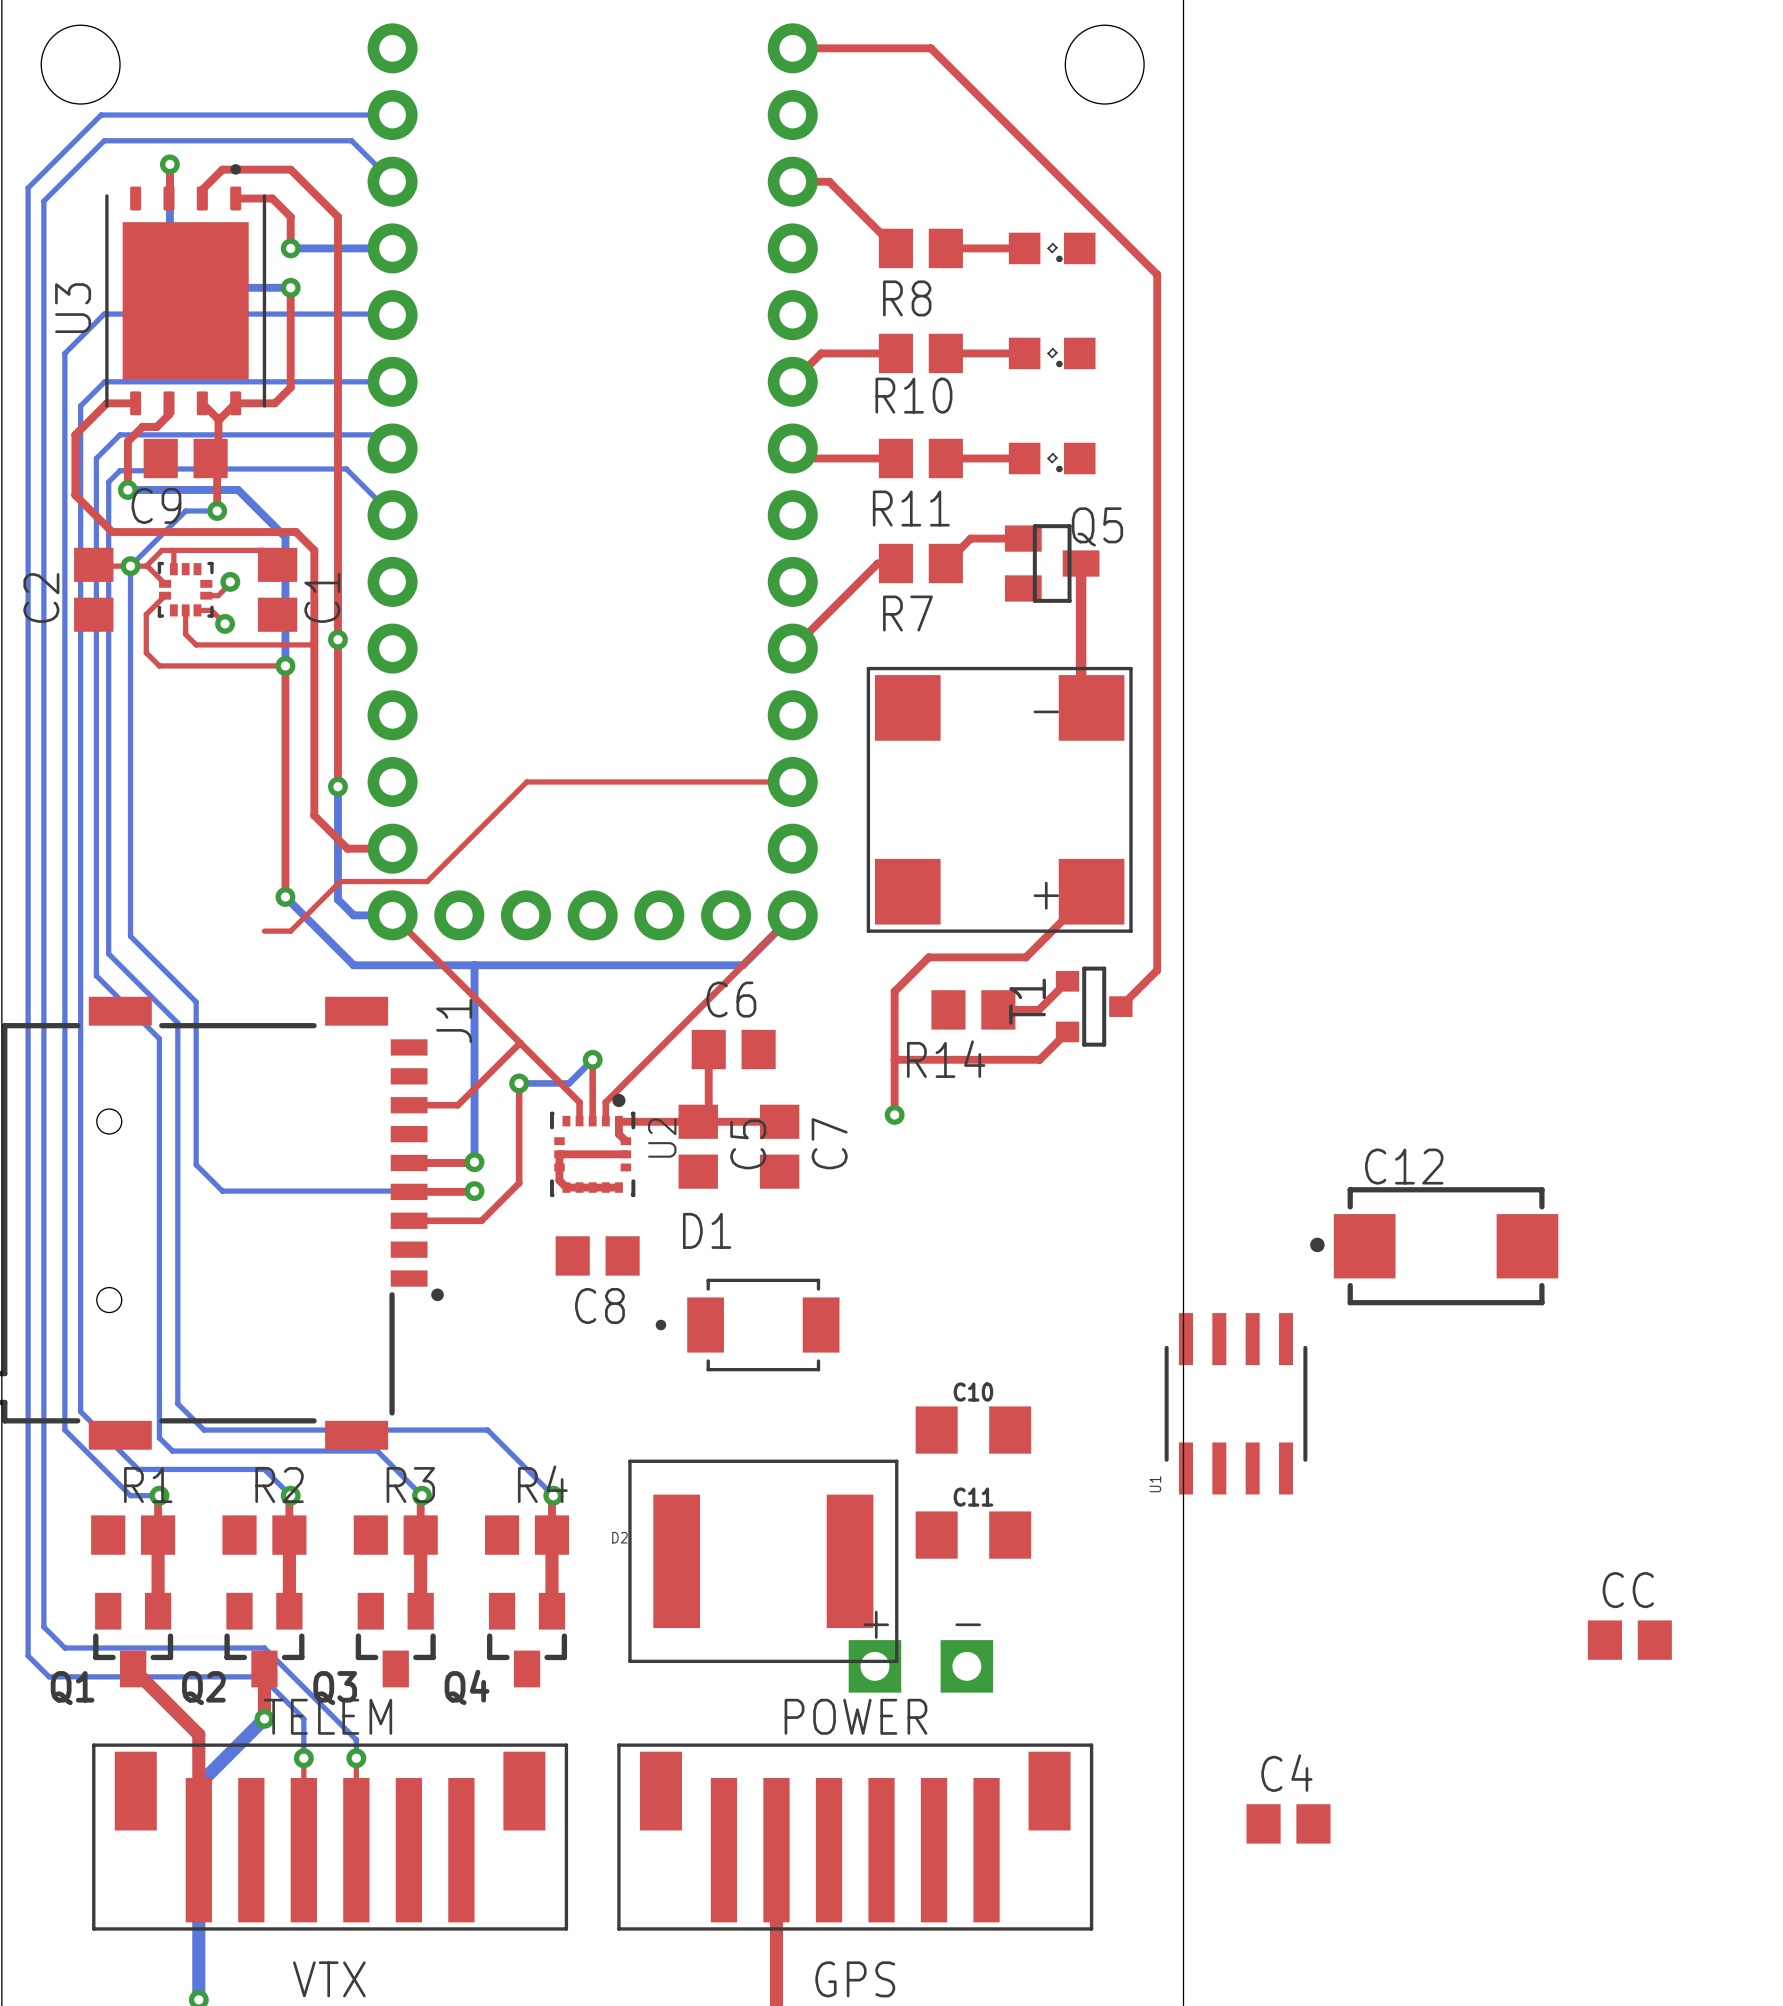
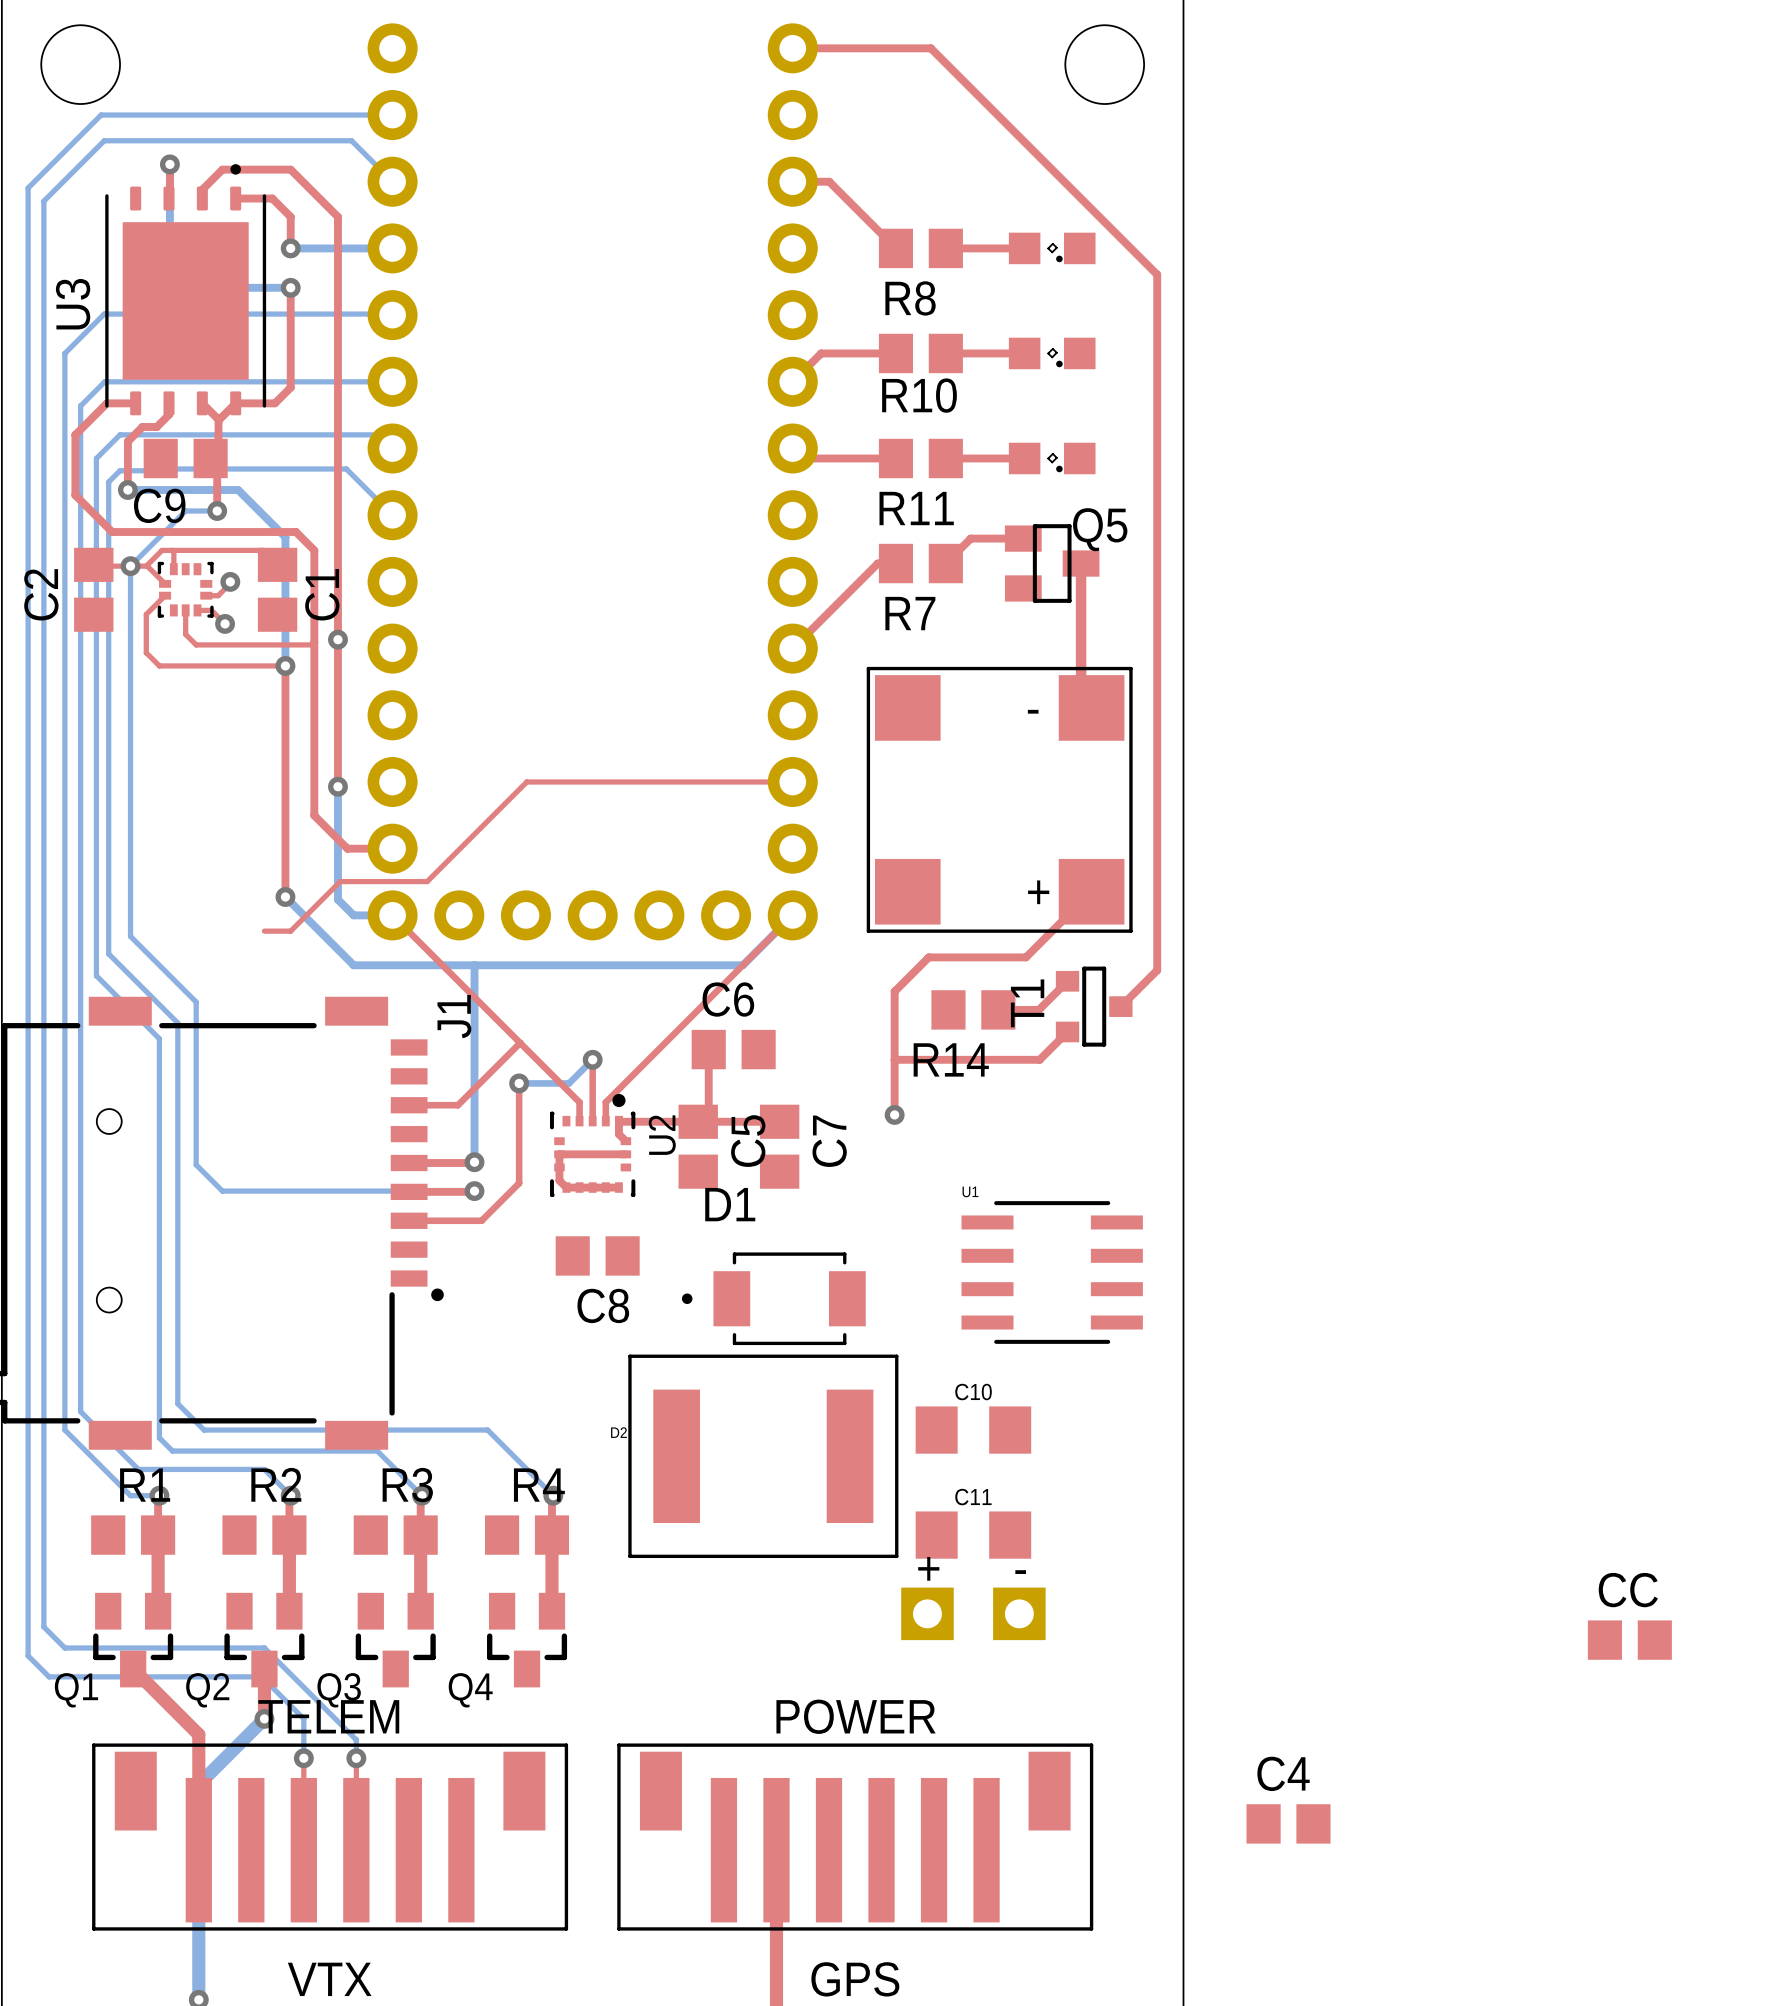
C12: (1434, 1246) -> none
D1 position: (747, 1325) -> (773, 1298)
U1 rotation: 0° (1236, 1403) -> 90° clockwise (1052, 1272)
U1 position: (1236, 1403) -> (1052, 1272)
D2 position: (763, 1561) -> (763, 1456)
part position: (920, 1666) -> (973, 1613)

